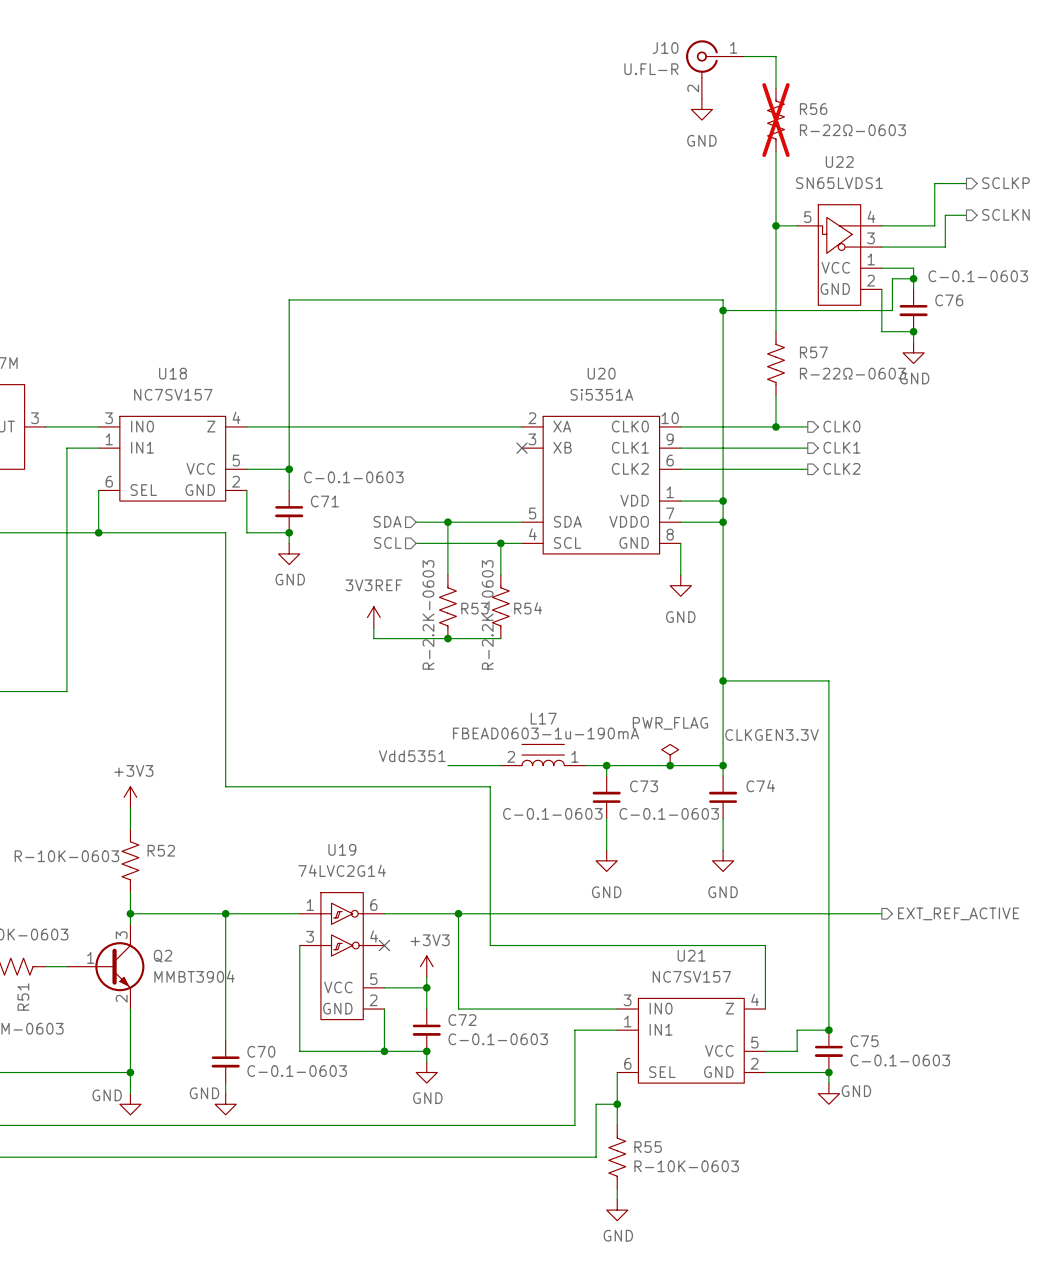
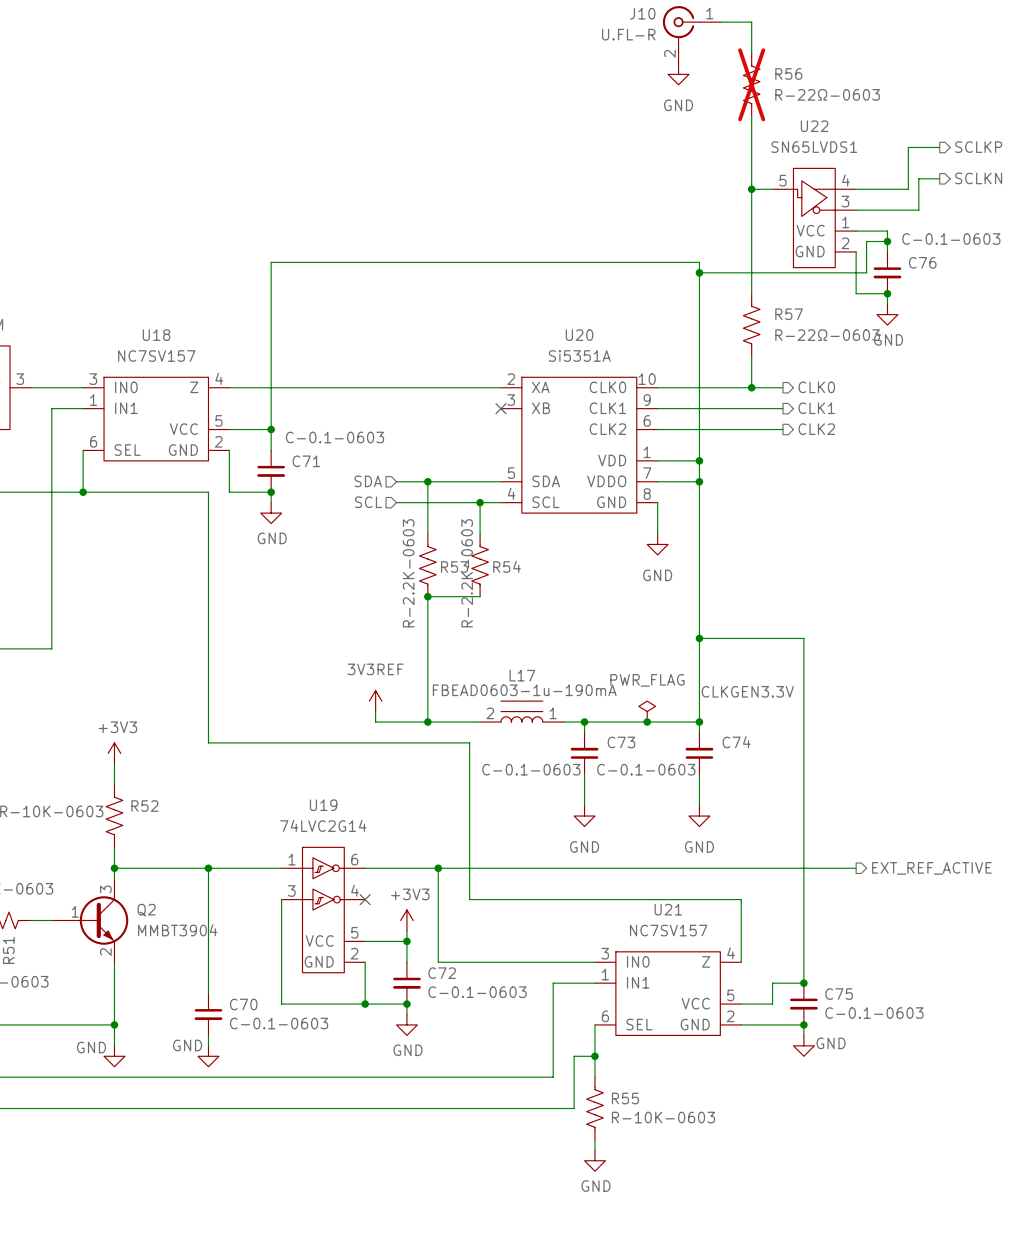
power symbol position: 3V3REF (373, 617) -> 3V3REF (375, 701)
wire: (373, 628) (373, 638) (447, 638) -> (375, 711) (375, 722) (427, 722) (427, 596)
label: Vdd5351 (412, 756) -> none
junction: none -> (427, 722)

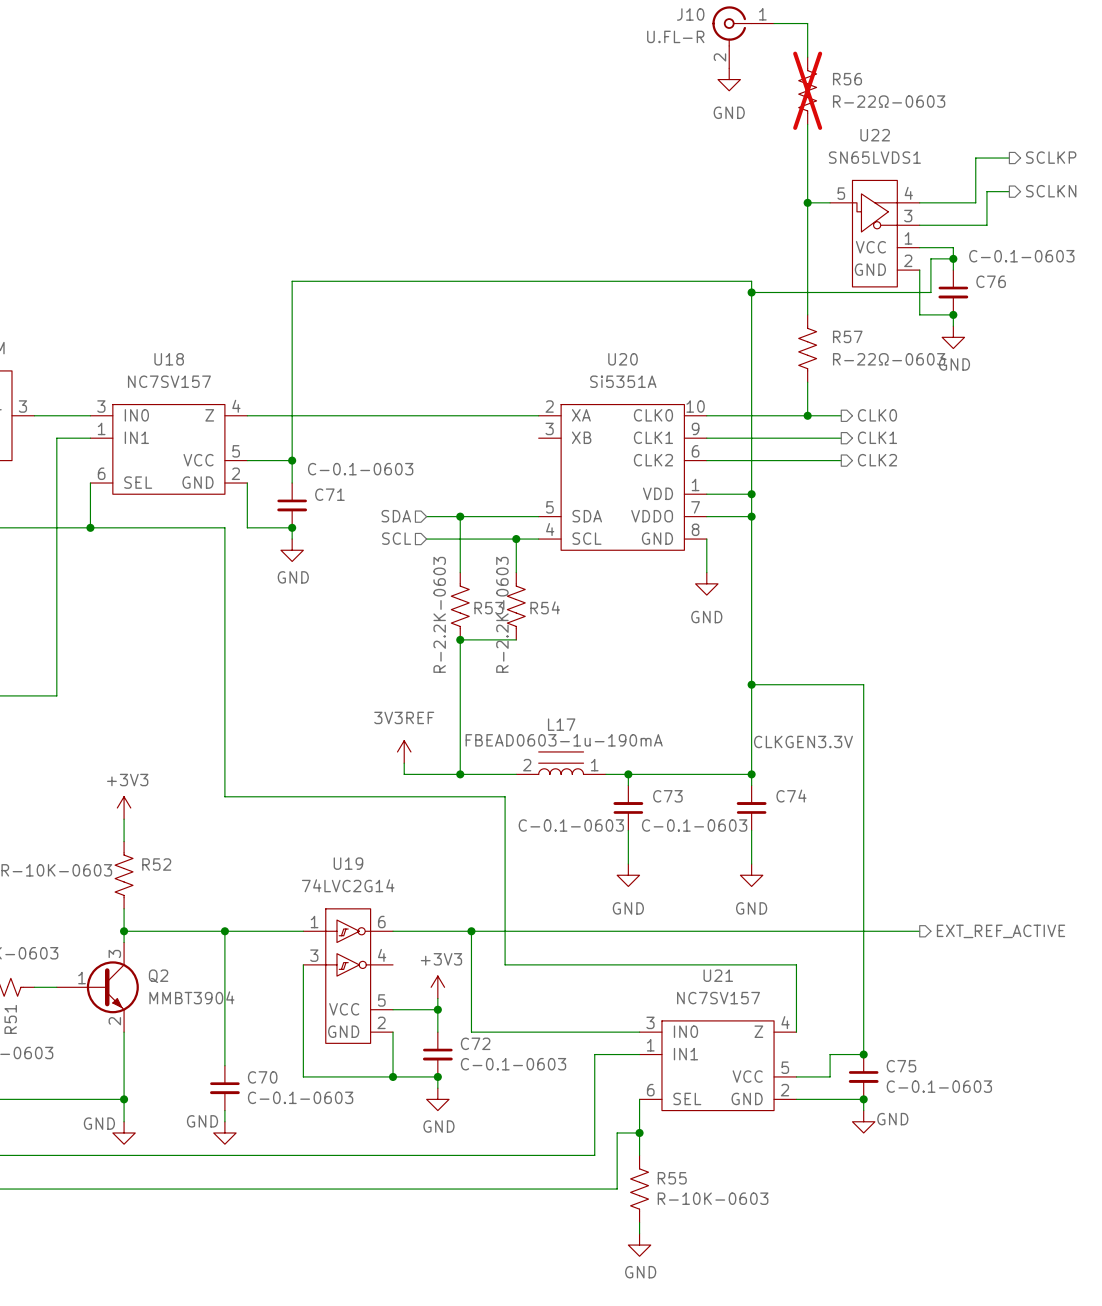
no-connect mark: (500, 408) -> none
power symbol: PWR_FLAG (647, 711) -> none
junction: (647, 722) -> none
no-connect mark: (365, 899) -> none

